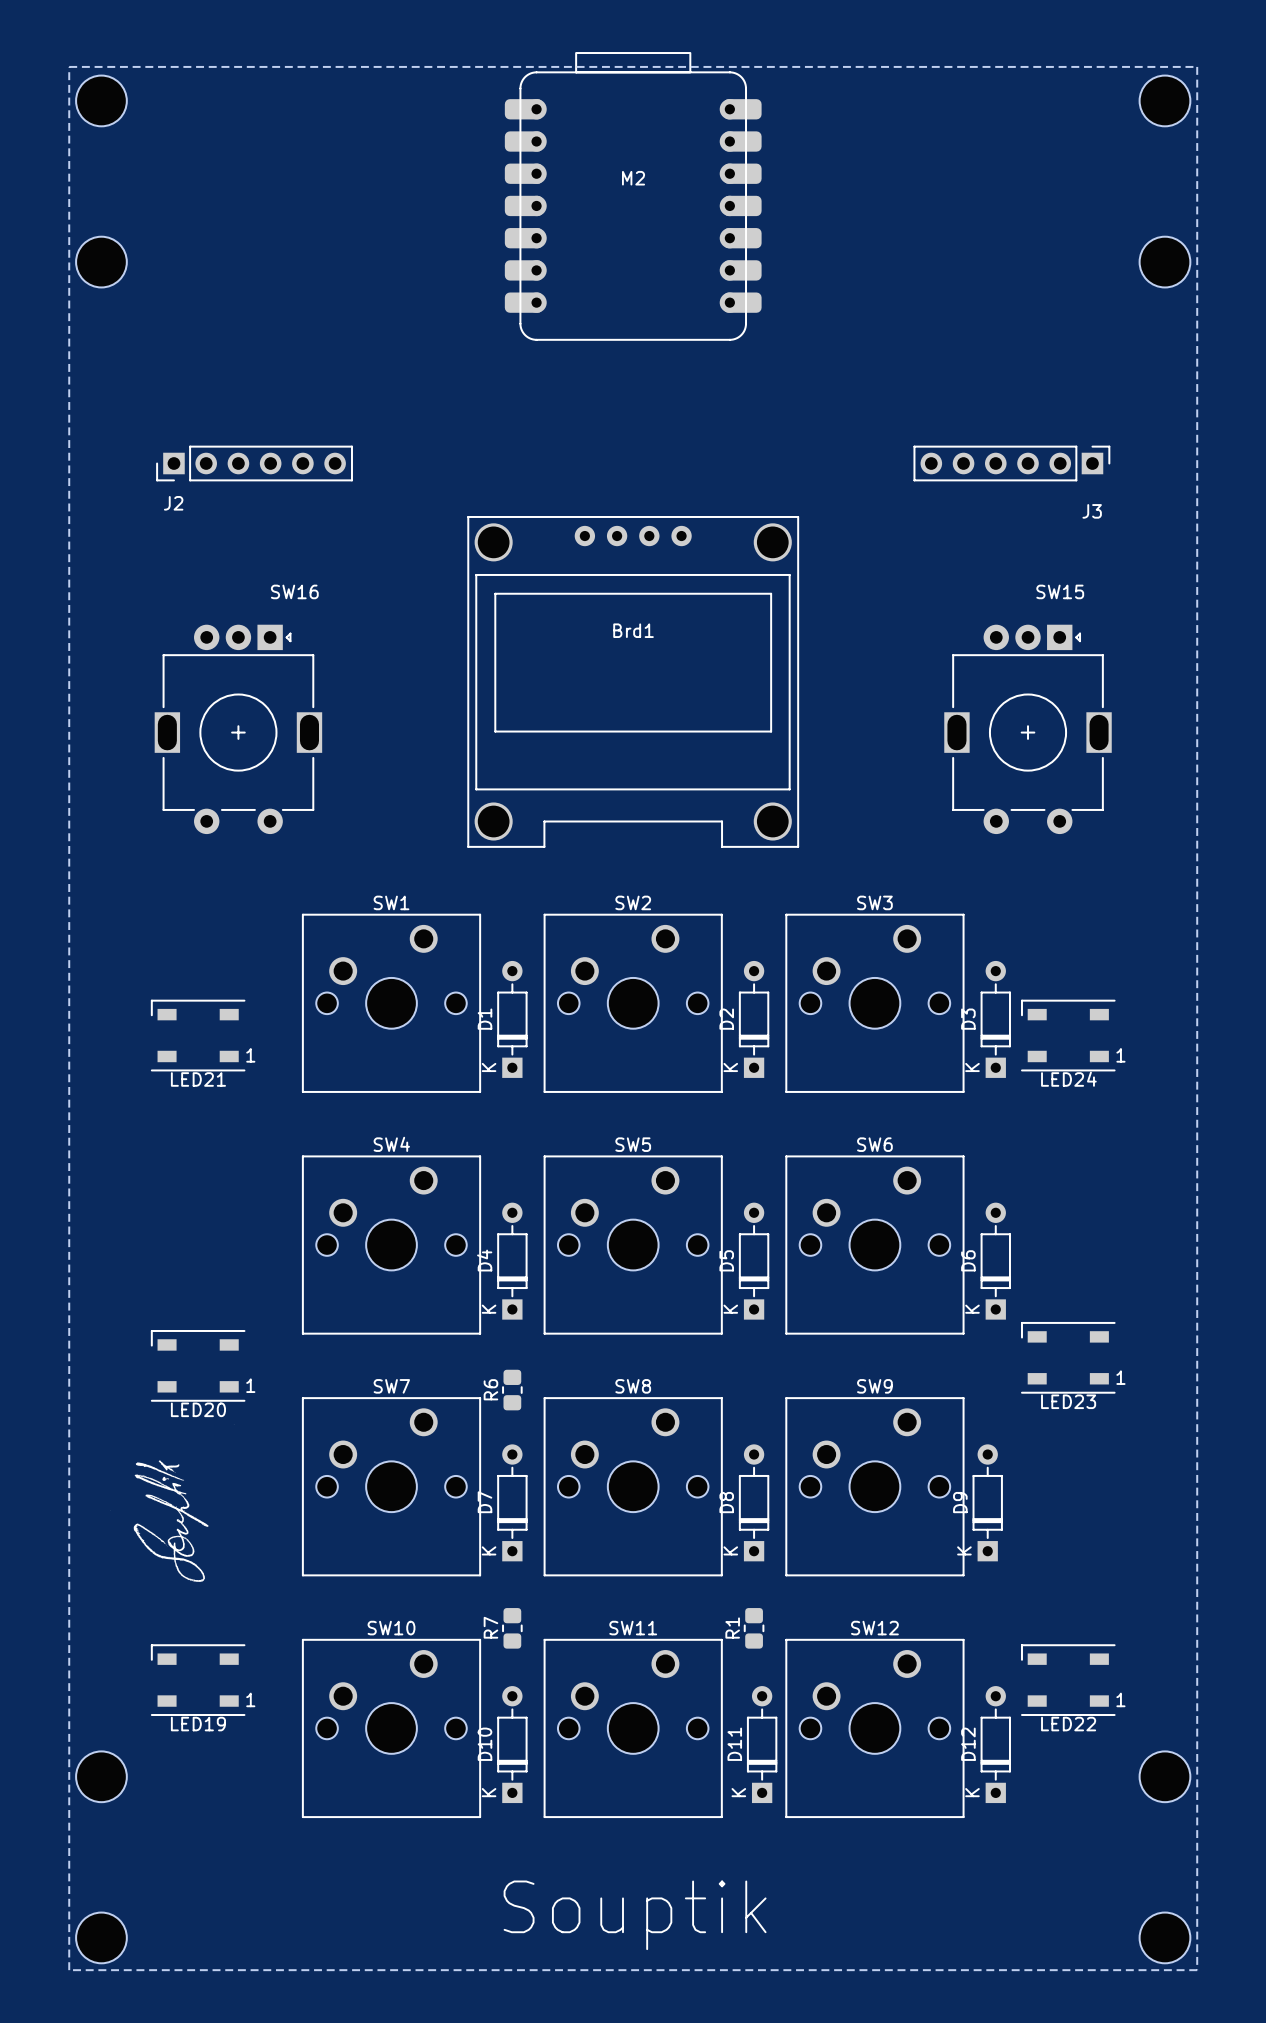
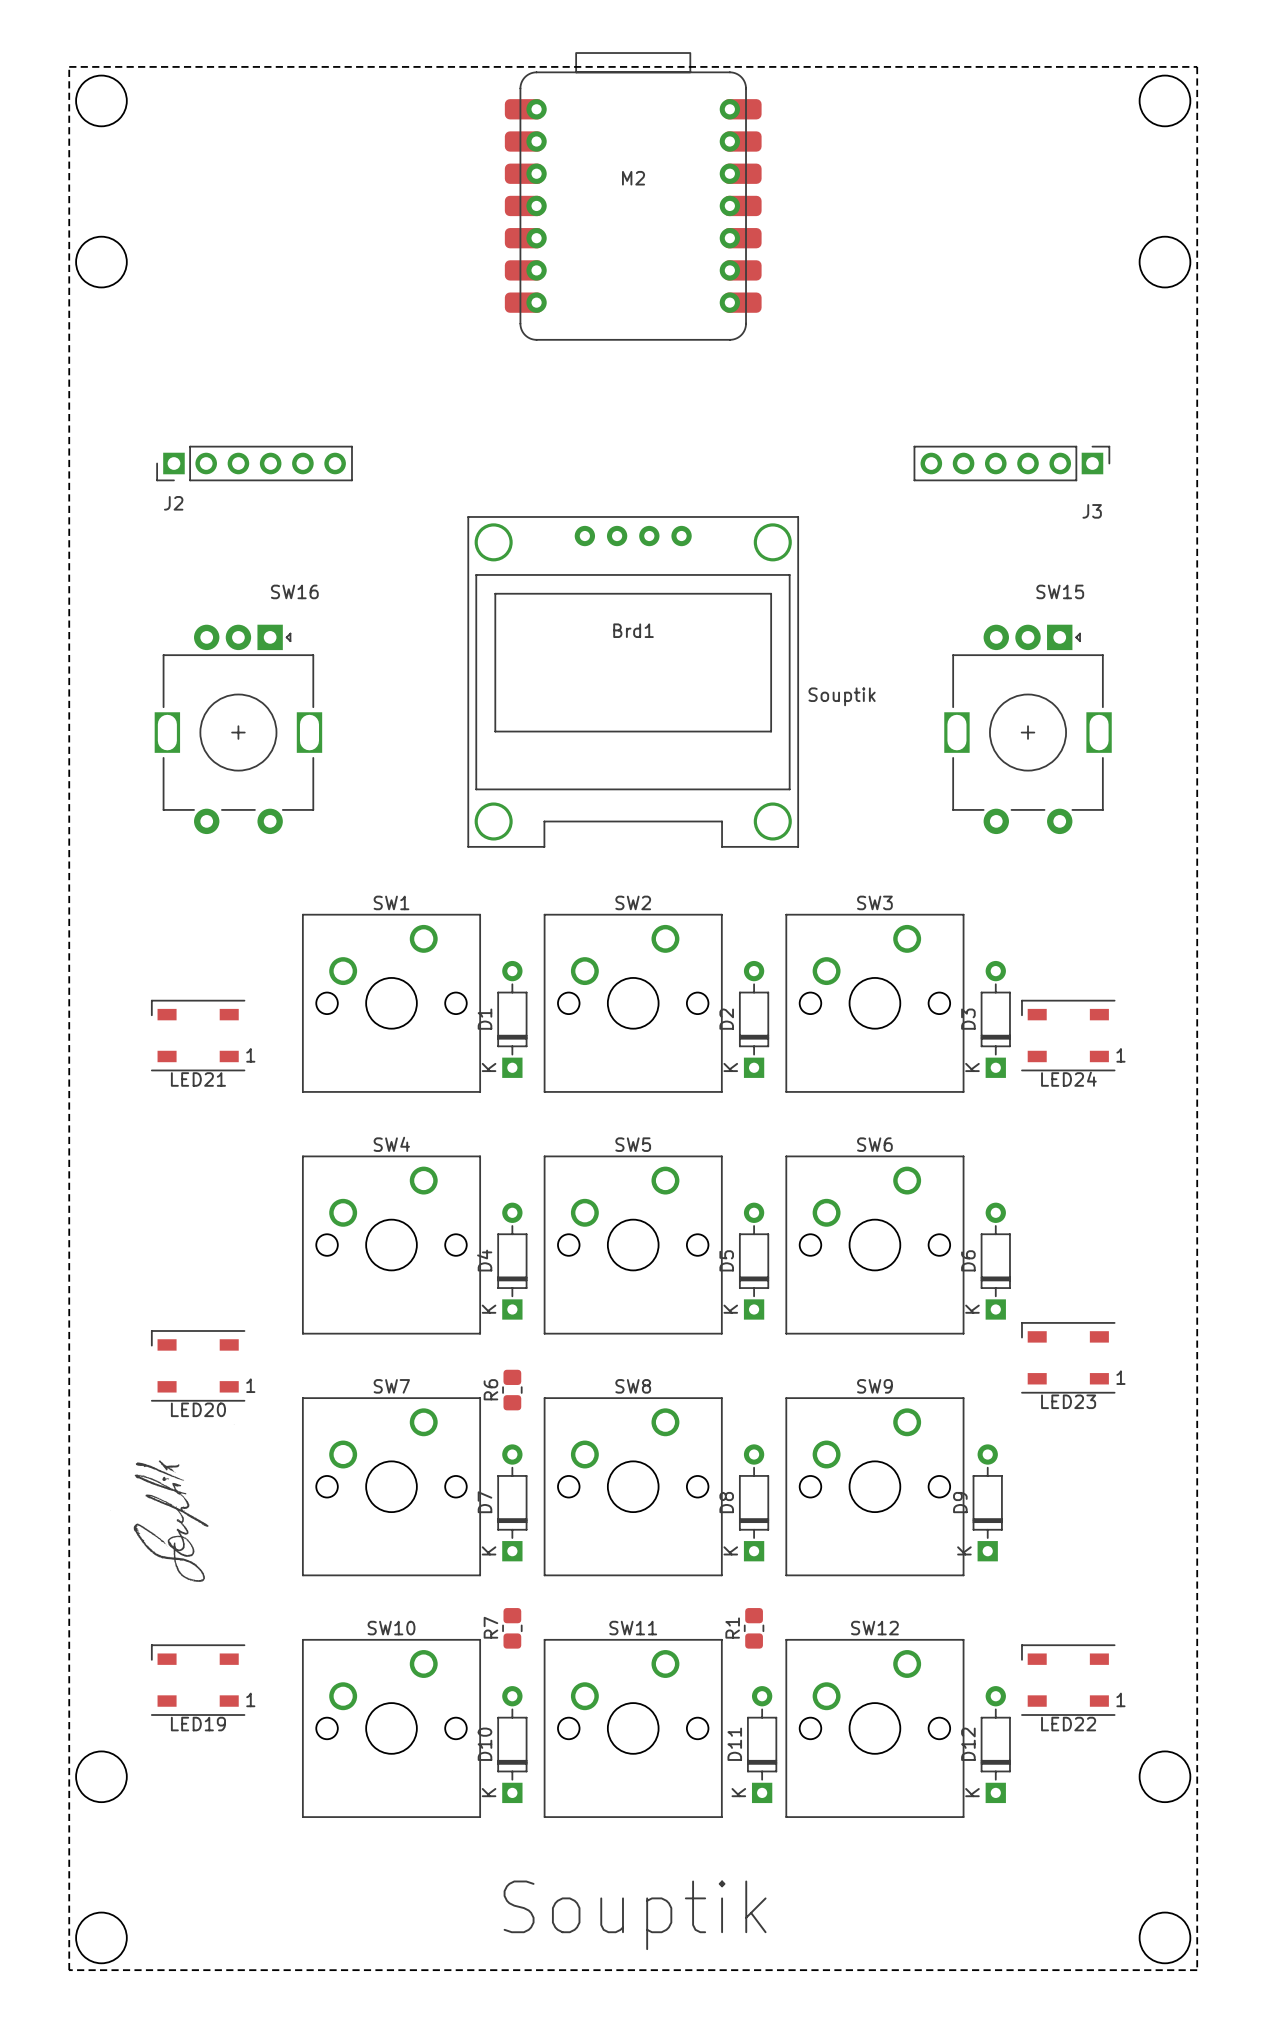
text: none -> Souptik (842, 696)

